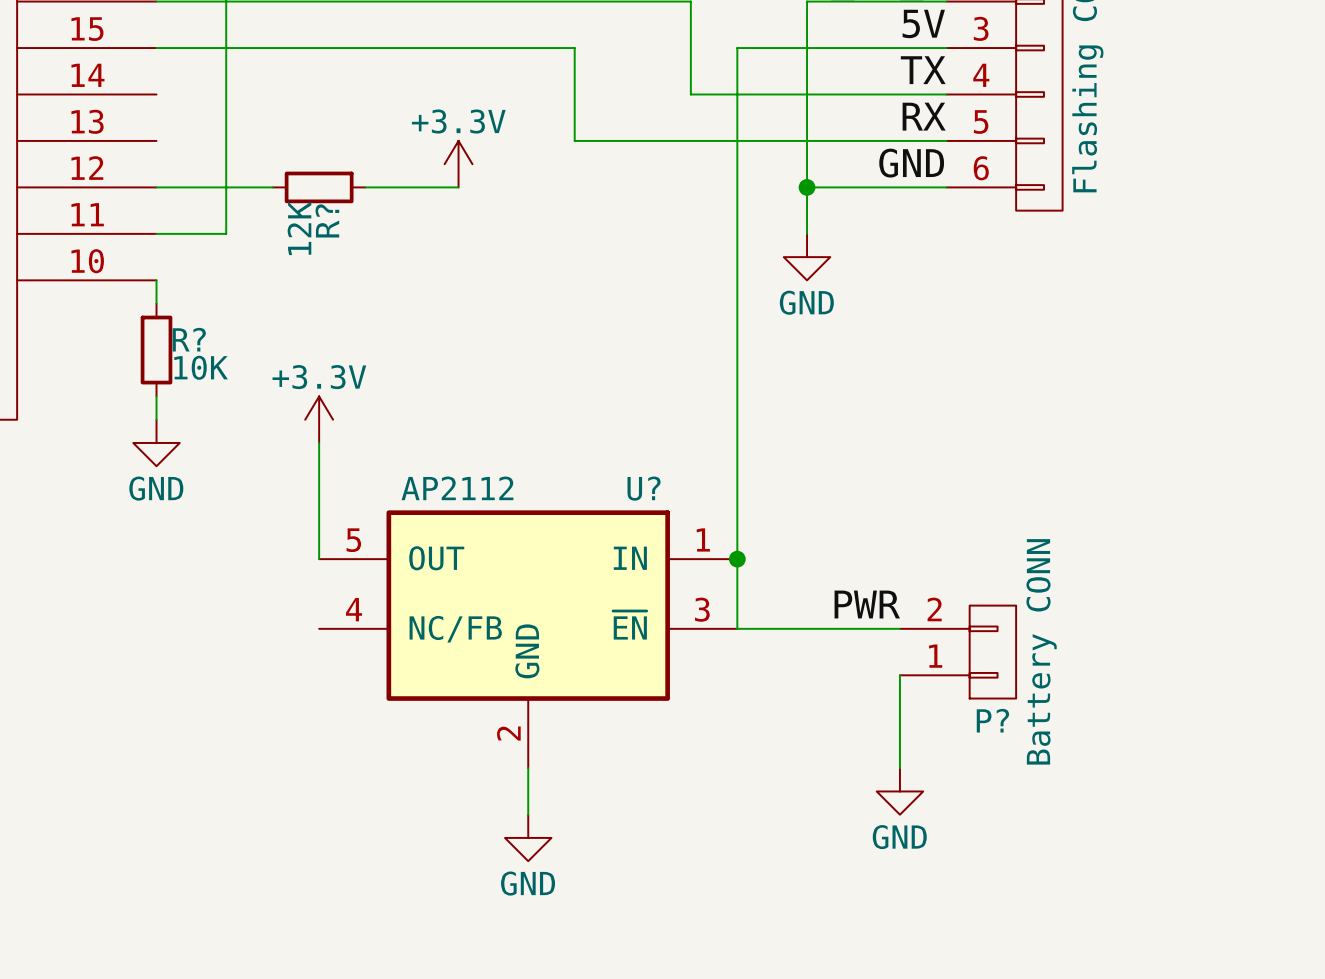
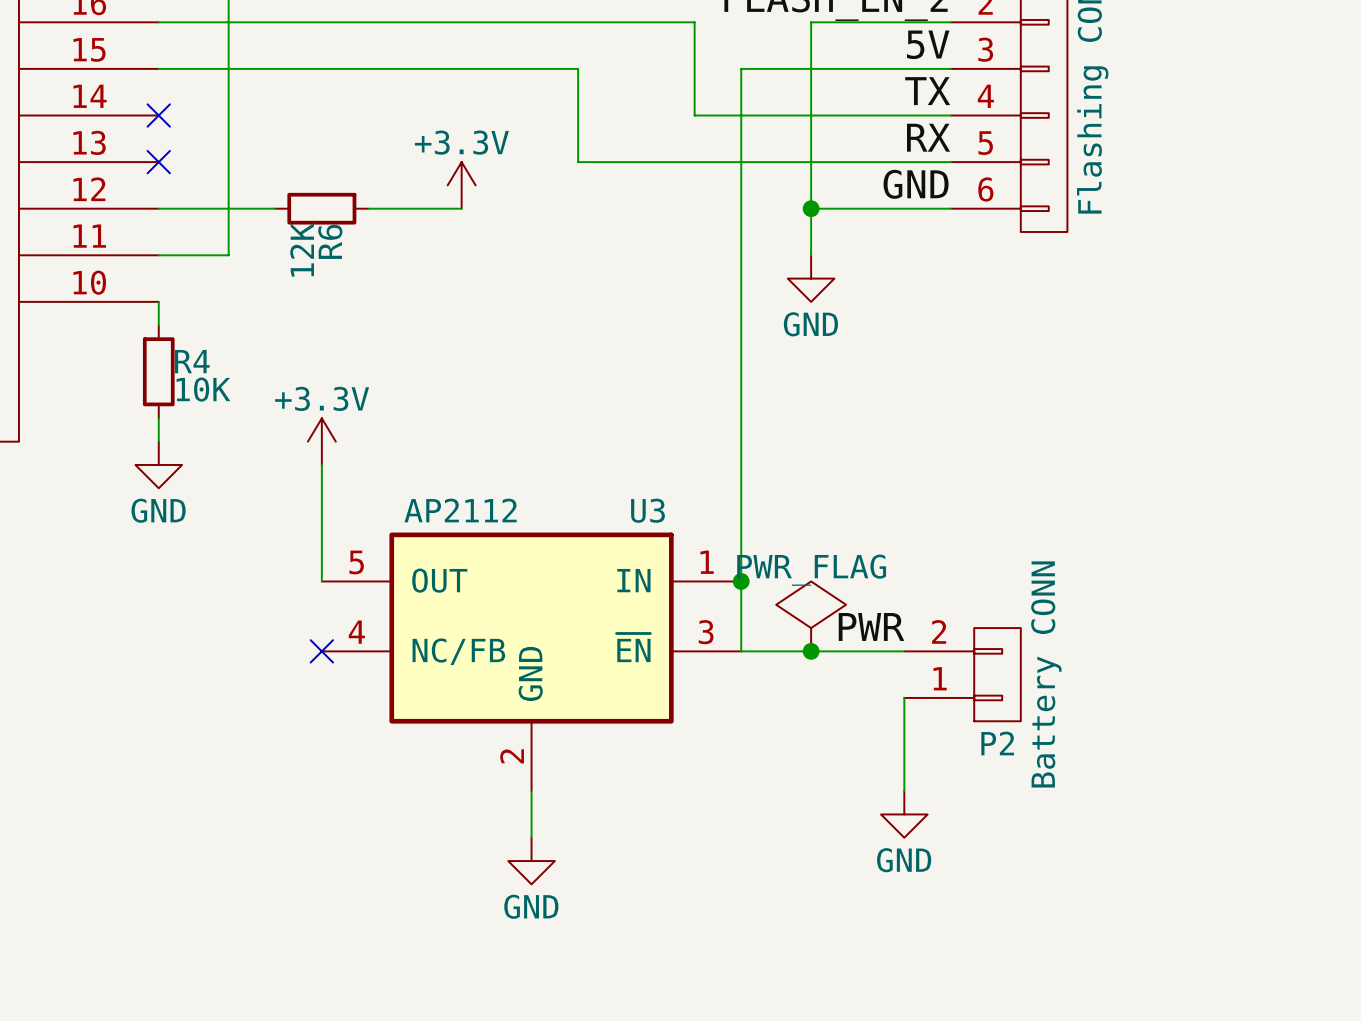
no-connect mark: none -> (158, 115)
no-connect mark: none -> (158, 162)
R? name: R? (327, 220) -> R6 (330, 241)
R? name: R? (189, 339) -> R4 (192, 361)
U? name: U? (644, 488) -> U3 (647, 510)
power symbol: none -> PWR_FLAG (811, 616)
no-connect mark: none -> (321, 651)
junction: none -> (811, 651)
P? name: P? (992, 720) -> P2 (997, 743)

